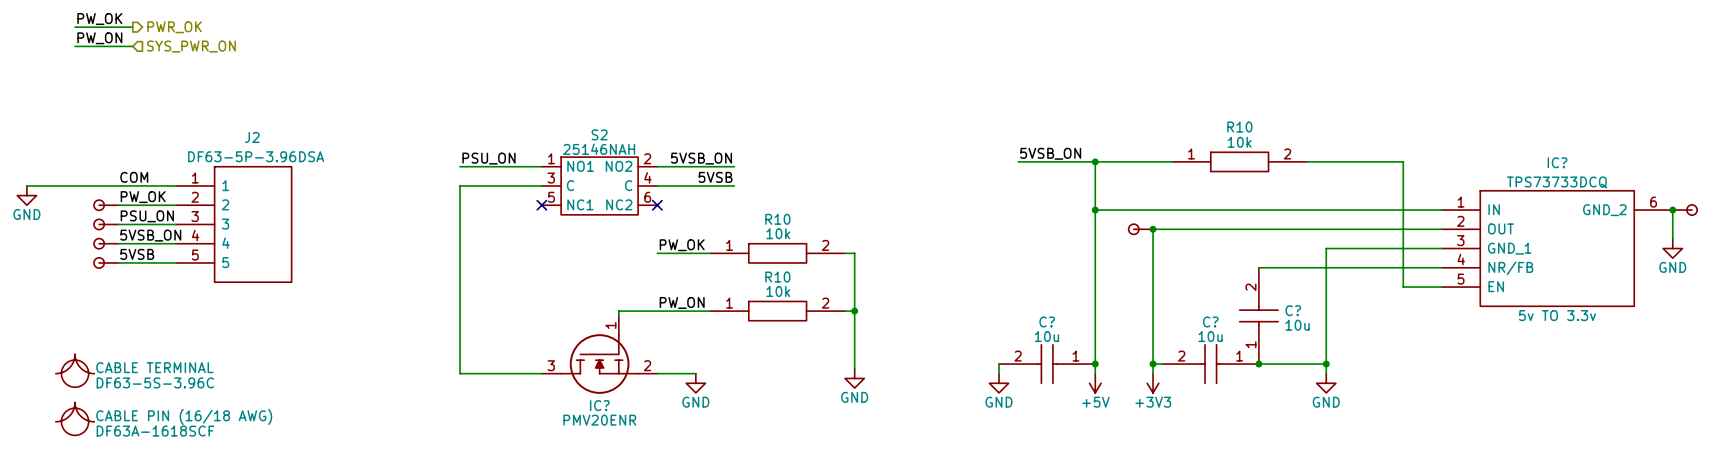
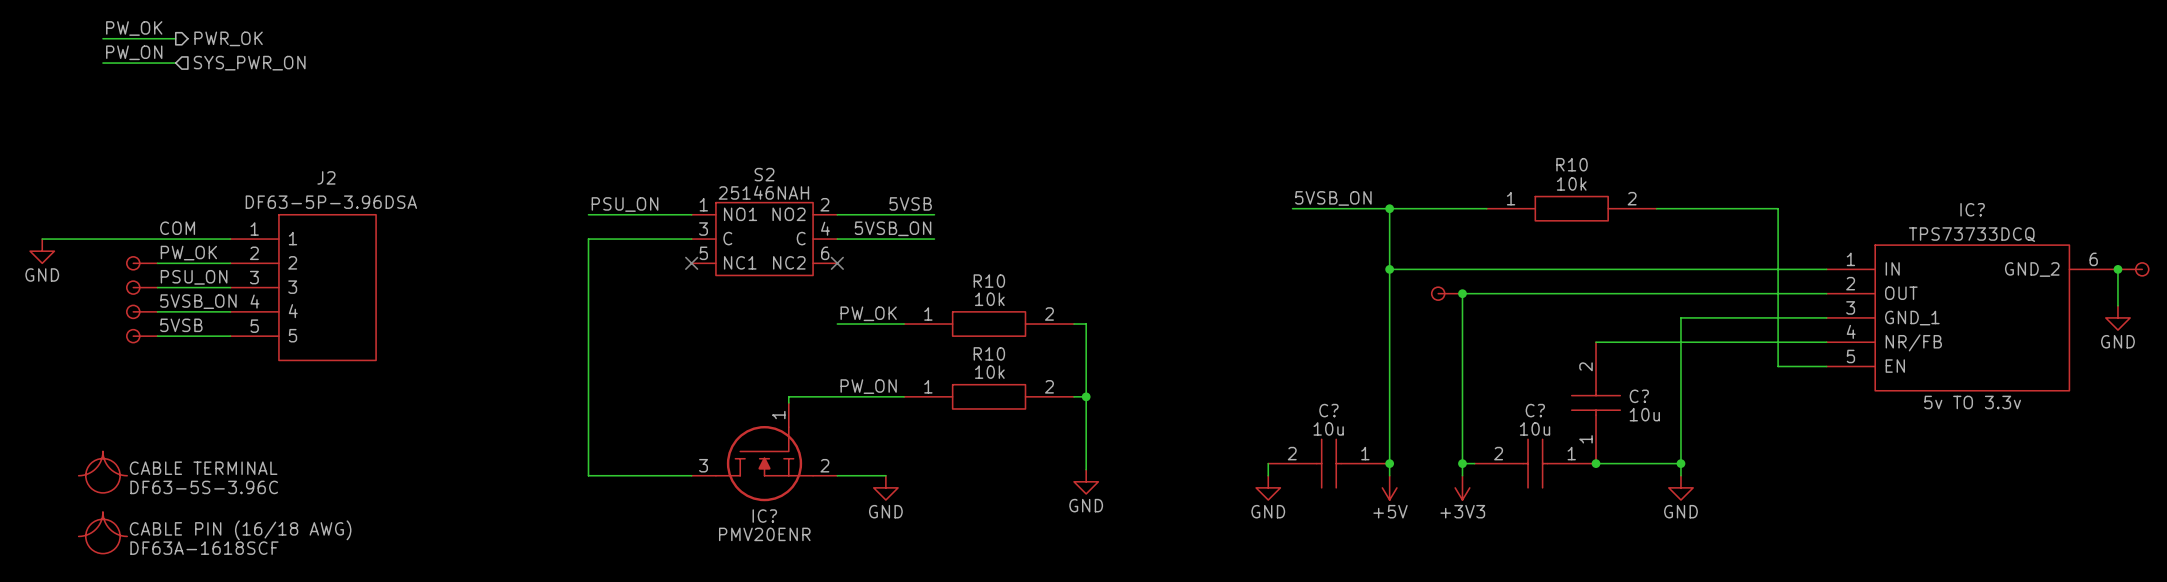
label: 5VSB_ON (701, 158) -> 5VSB (910, 203)
label: 5VSB (715, 177) -> 5VSB_ON (893, 228)

